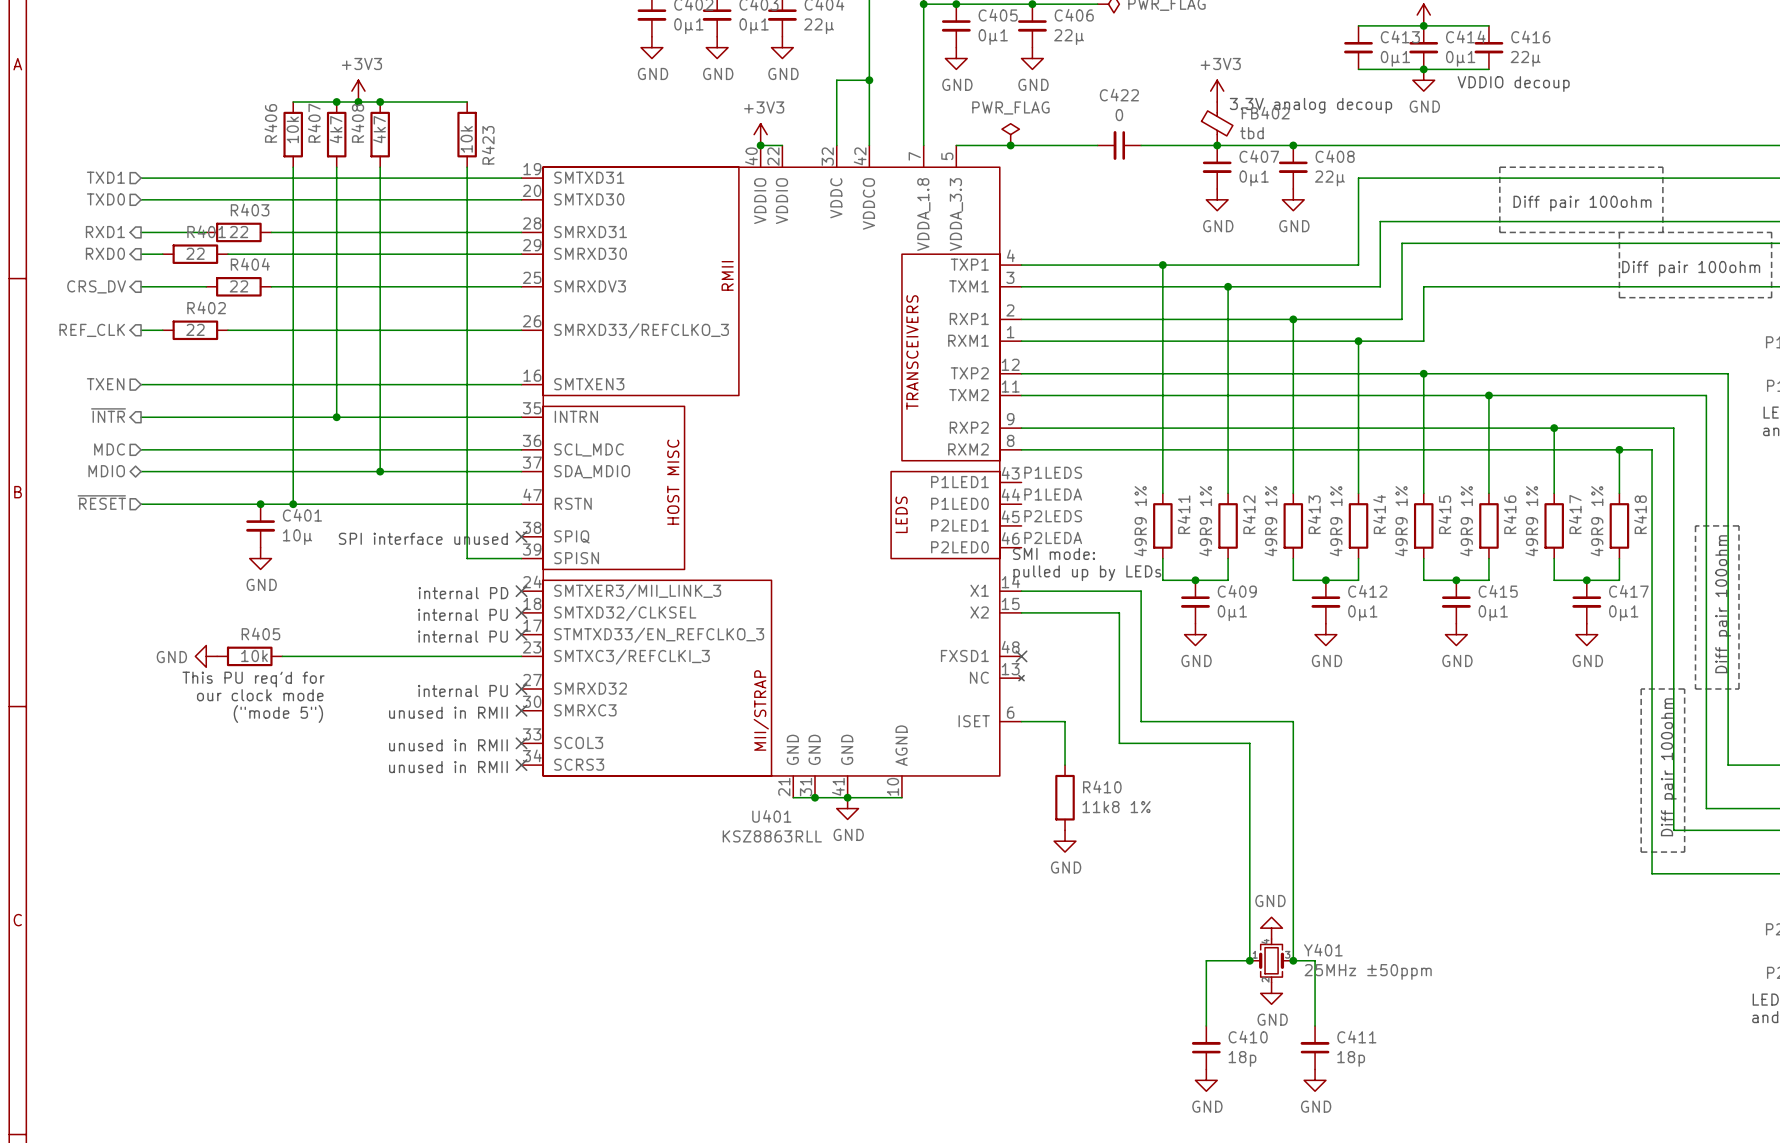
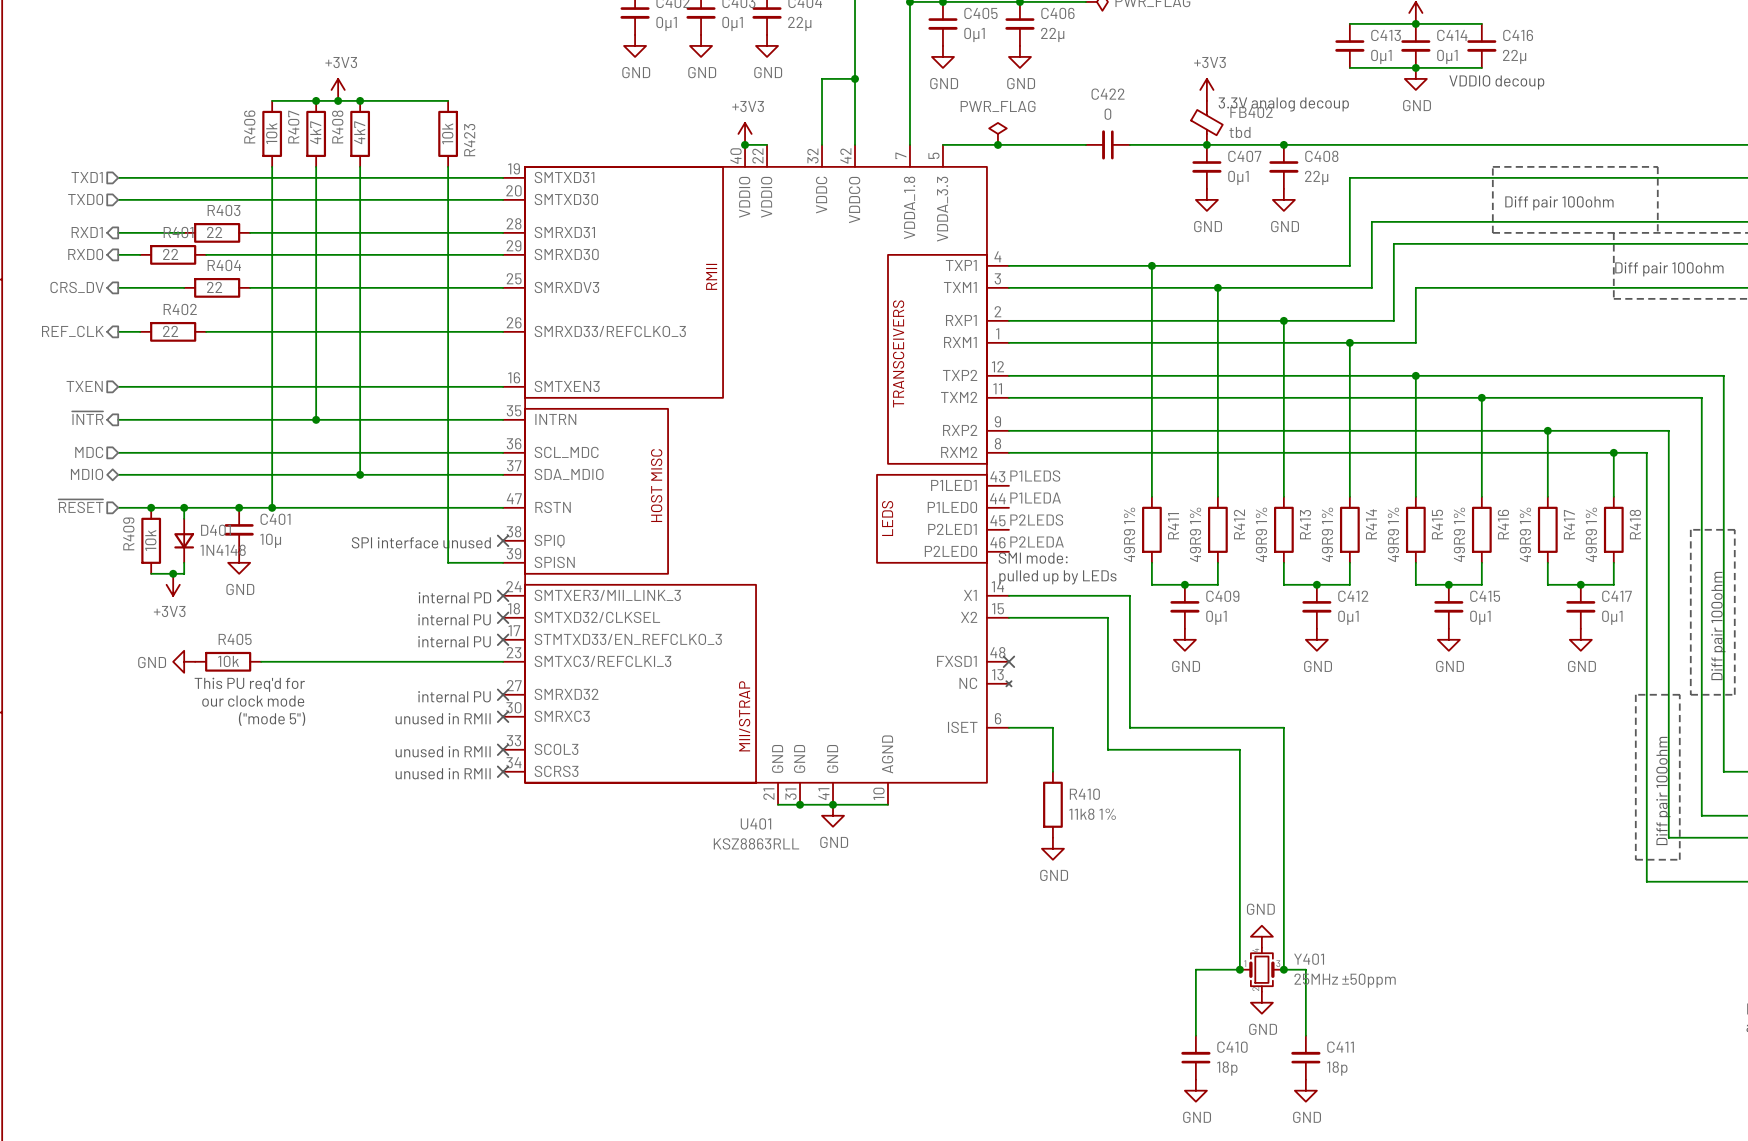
junction: none -> (151, 507)
wire: none -> (184, 507) (184, 518)
junction: none -> (184, 507)
R409: none -> 10k (151, 540)
D401: none -> 1N4148 (184, 540)
wire: none -> (184, 562) (184, 573) (151, 573)
junction: none -> (173, 573)
power symbol: none -> +3V3 (173, 584)

